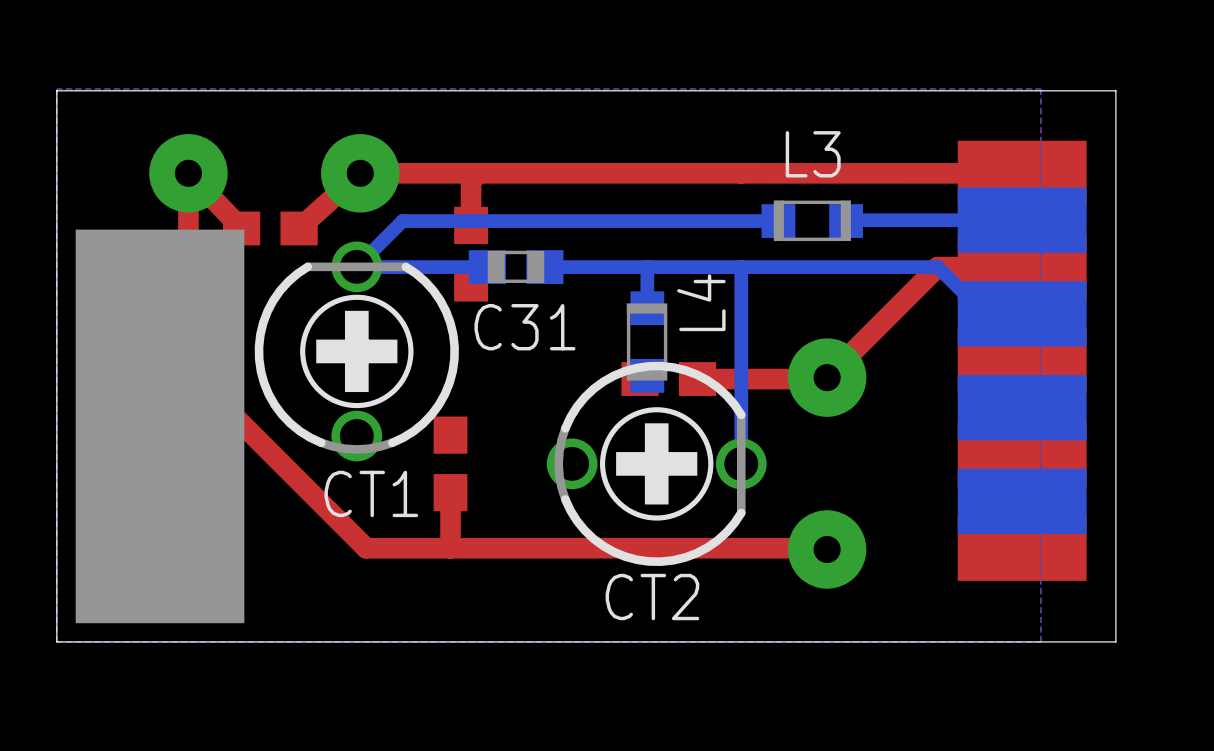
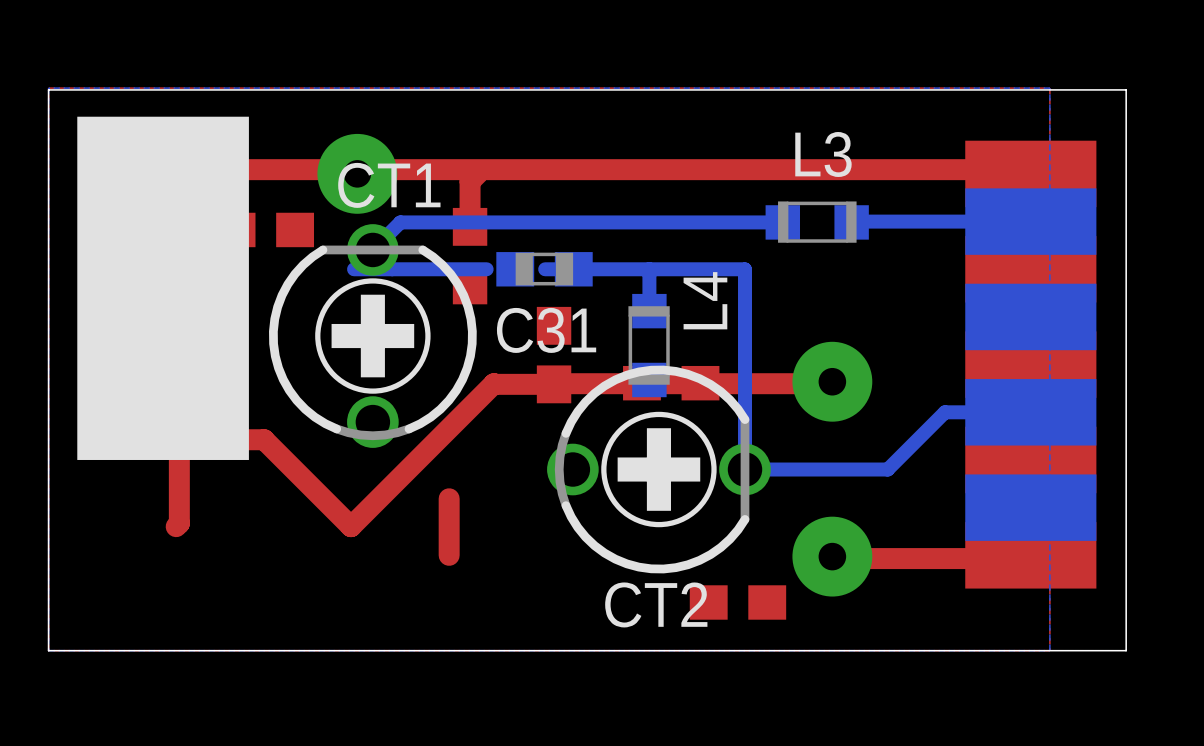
drawing: none -> [77, 116, 249, 460]
top track: (1022, 173) (360, 173) (299, 228) -> (1030, 173) (1026, 169) (243, 169) (179, 233) (179, 523) (176, 526)
top track: (241, 228) (188, 173) (188, 370) (366, 548) (827, 549) -> none
drawing: [75, 229, 245, 624] -> none
C31 position: (516, 267) -> (544, 269)
bottom track: (741, 267) (937, 267) (984, 313) (1022, 313) (1019, 317) -> none
top track: (1022, 267) (937, 267) (825, 379) (697, 379) -> none
CT1 position: (356, 351) -> (372, 336)
top track: none -> (849, 383) (494, 383) (351, 526) (264, 439) (237, 439)
bottom track: none -> (1030, 412) (945, 412) (887, 469) (745, 469)
part position: (450, 463) -> (554, 355)
CT1 name position: CT1 (371, 493) -> CT1 (389, 185)
top track: none -> (1030, 555) (1027, 558) (849, 558) (846, 555)
part: none -> (737, 602)

